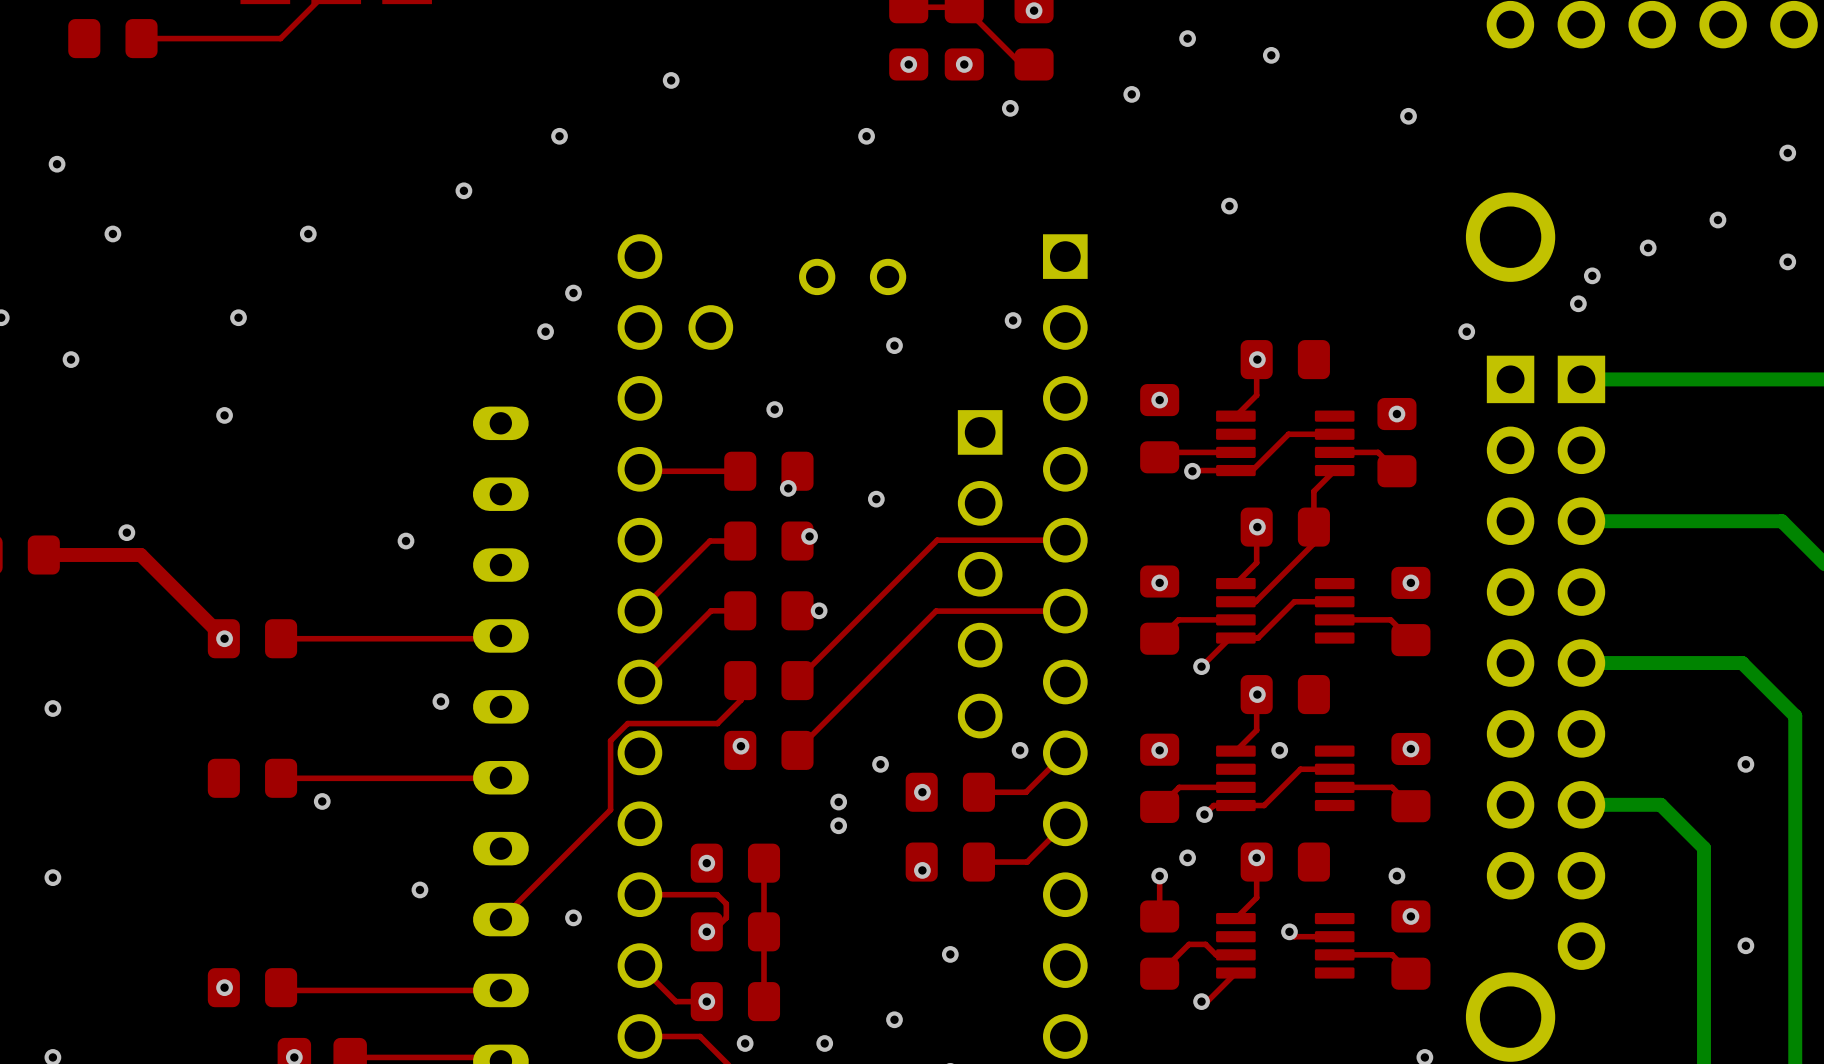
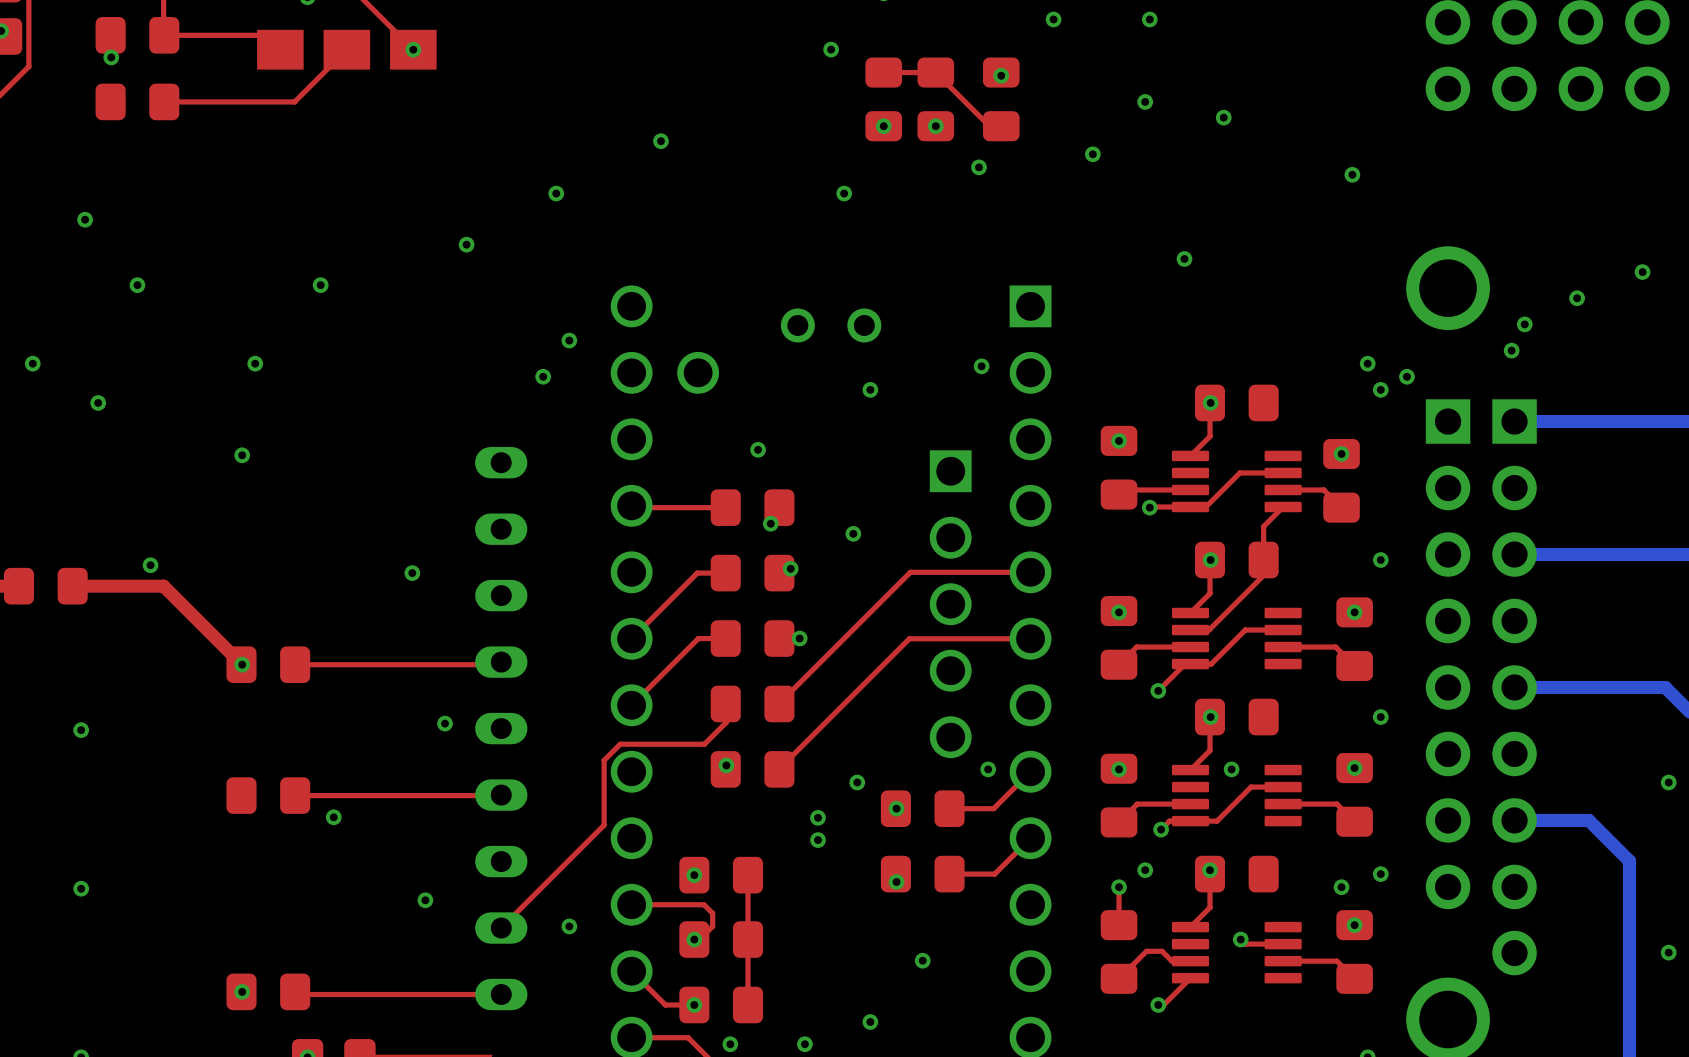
via: none -> (1367, 363)
via: none -> (1380, 389)
via: none -> (1380, 560)
via: none -> (1380, 717)
via: none -> (1380, 874)

